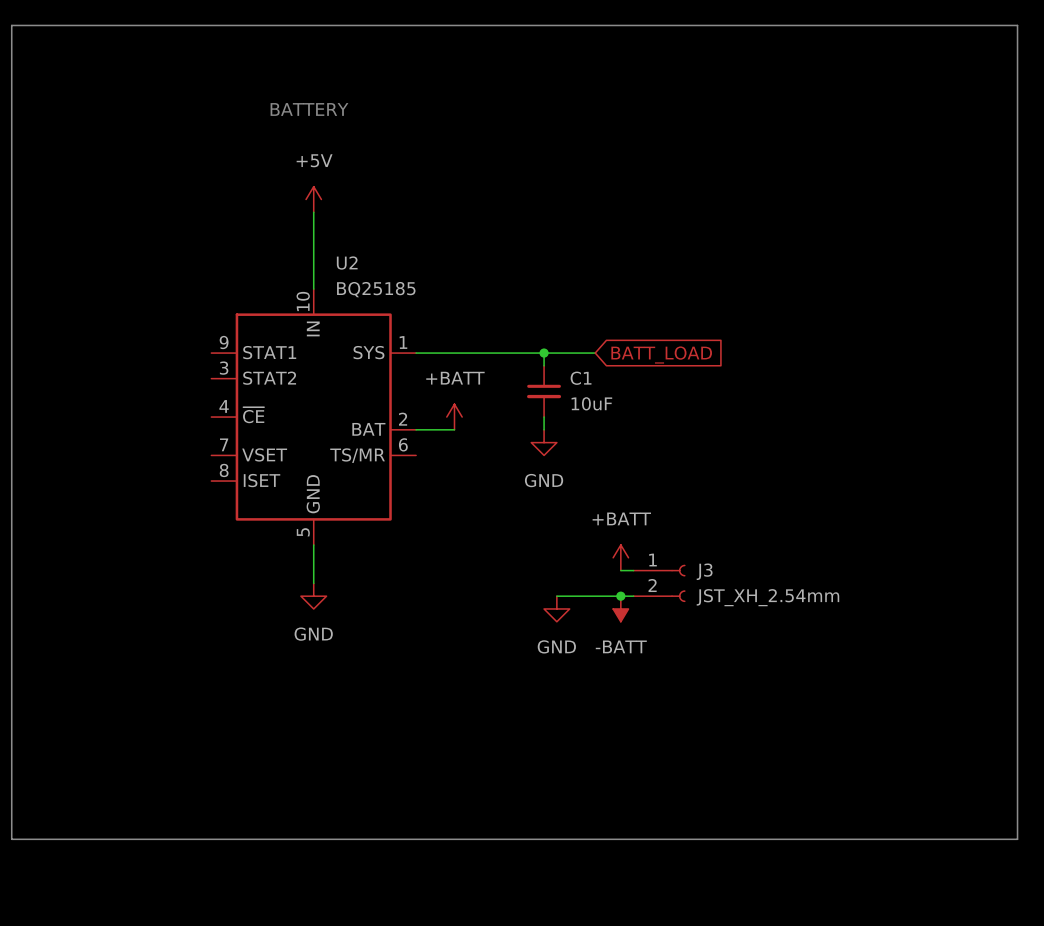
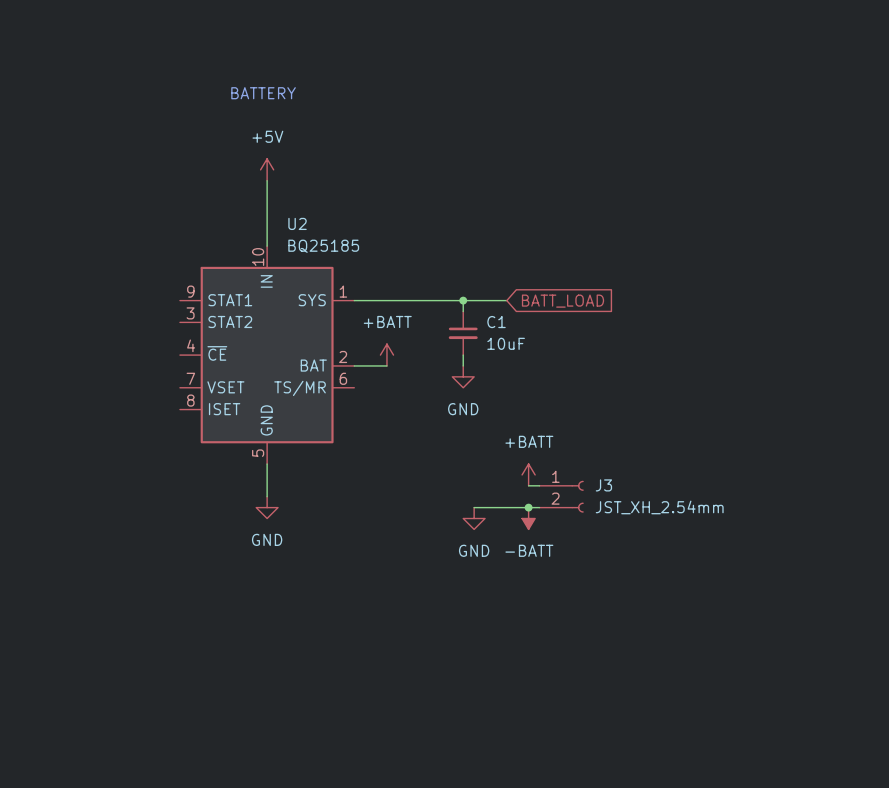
line: (11, 25) (1017, 25) (1017, 839) (11, 839) (11, 25) -> none

